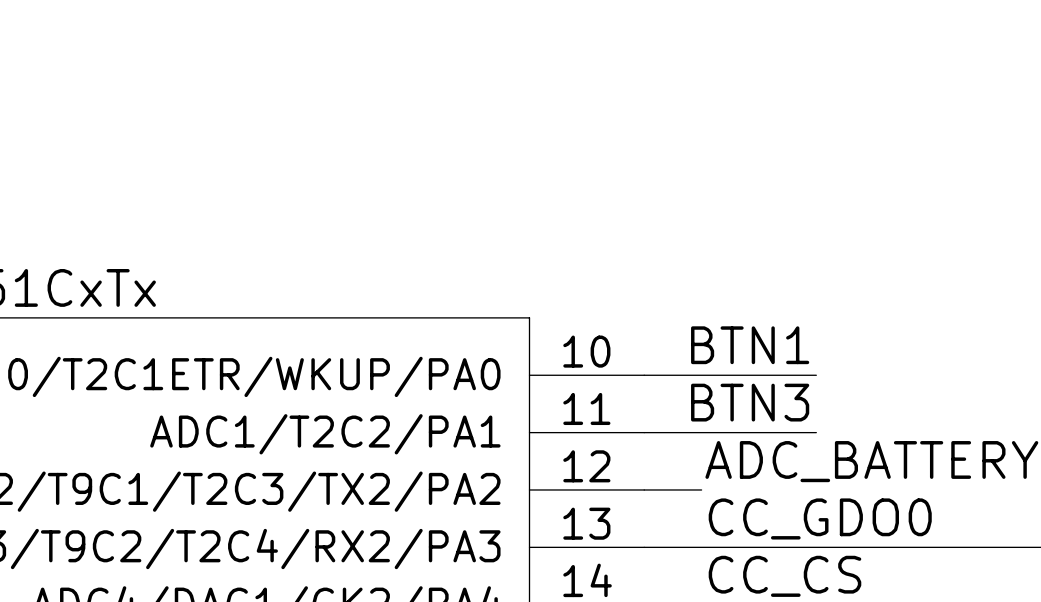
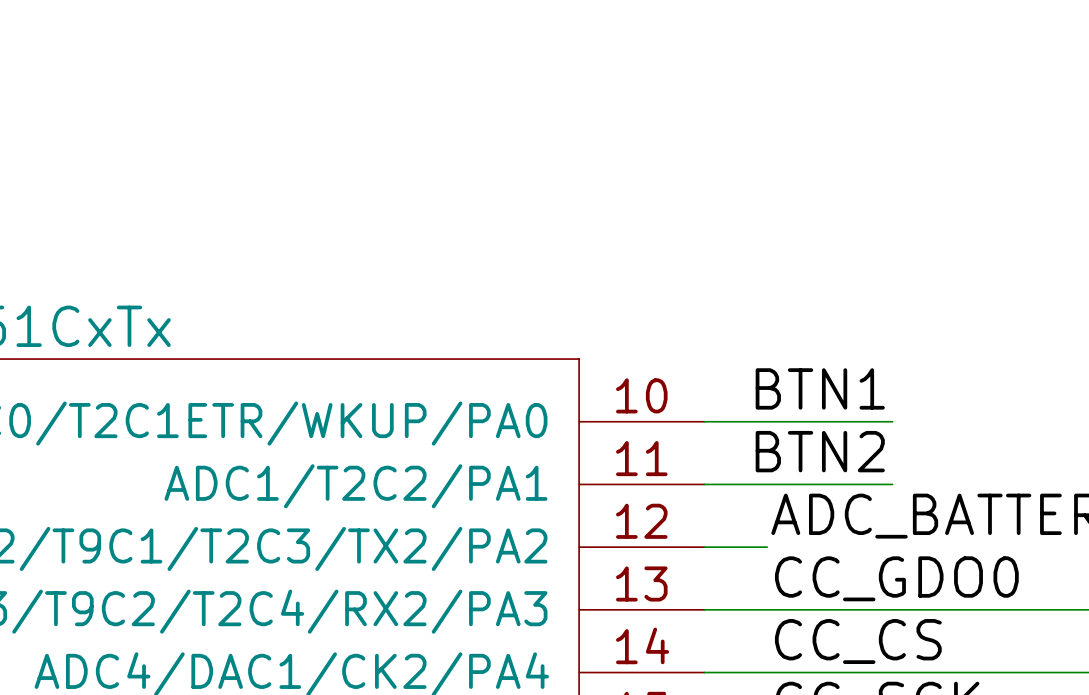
label: BTN3 (750, 402) -> BTN2 (820, 451)

